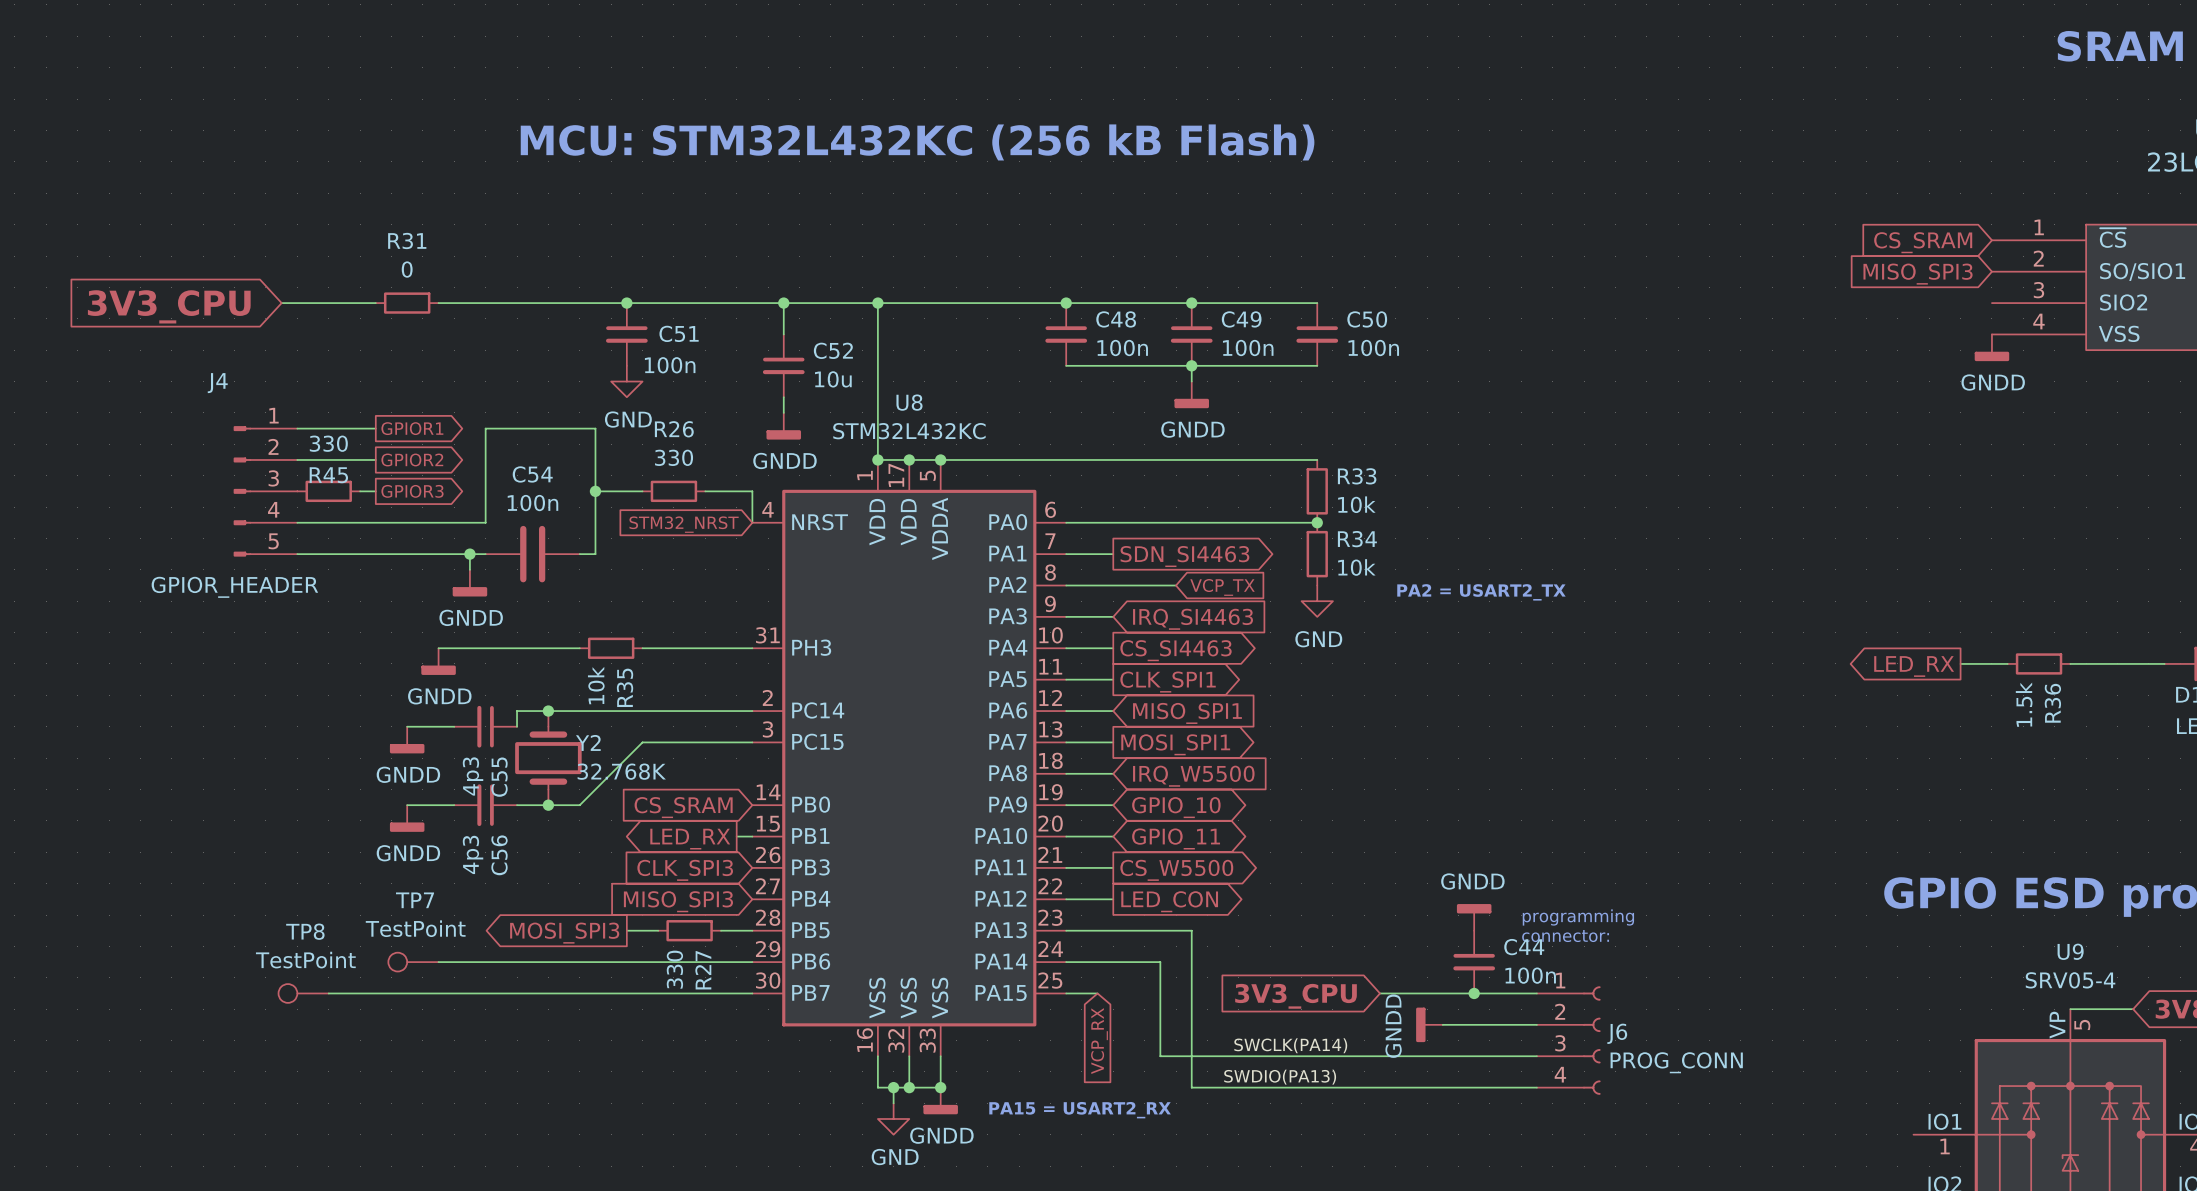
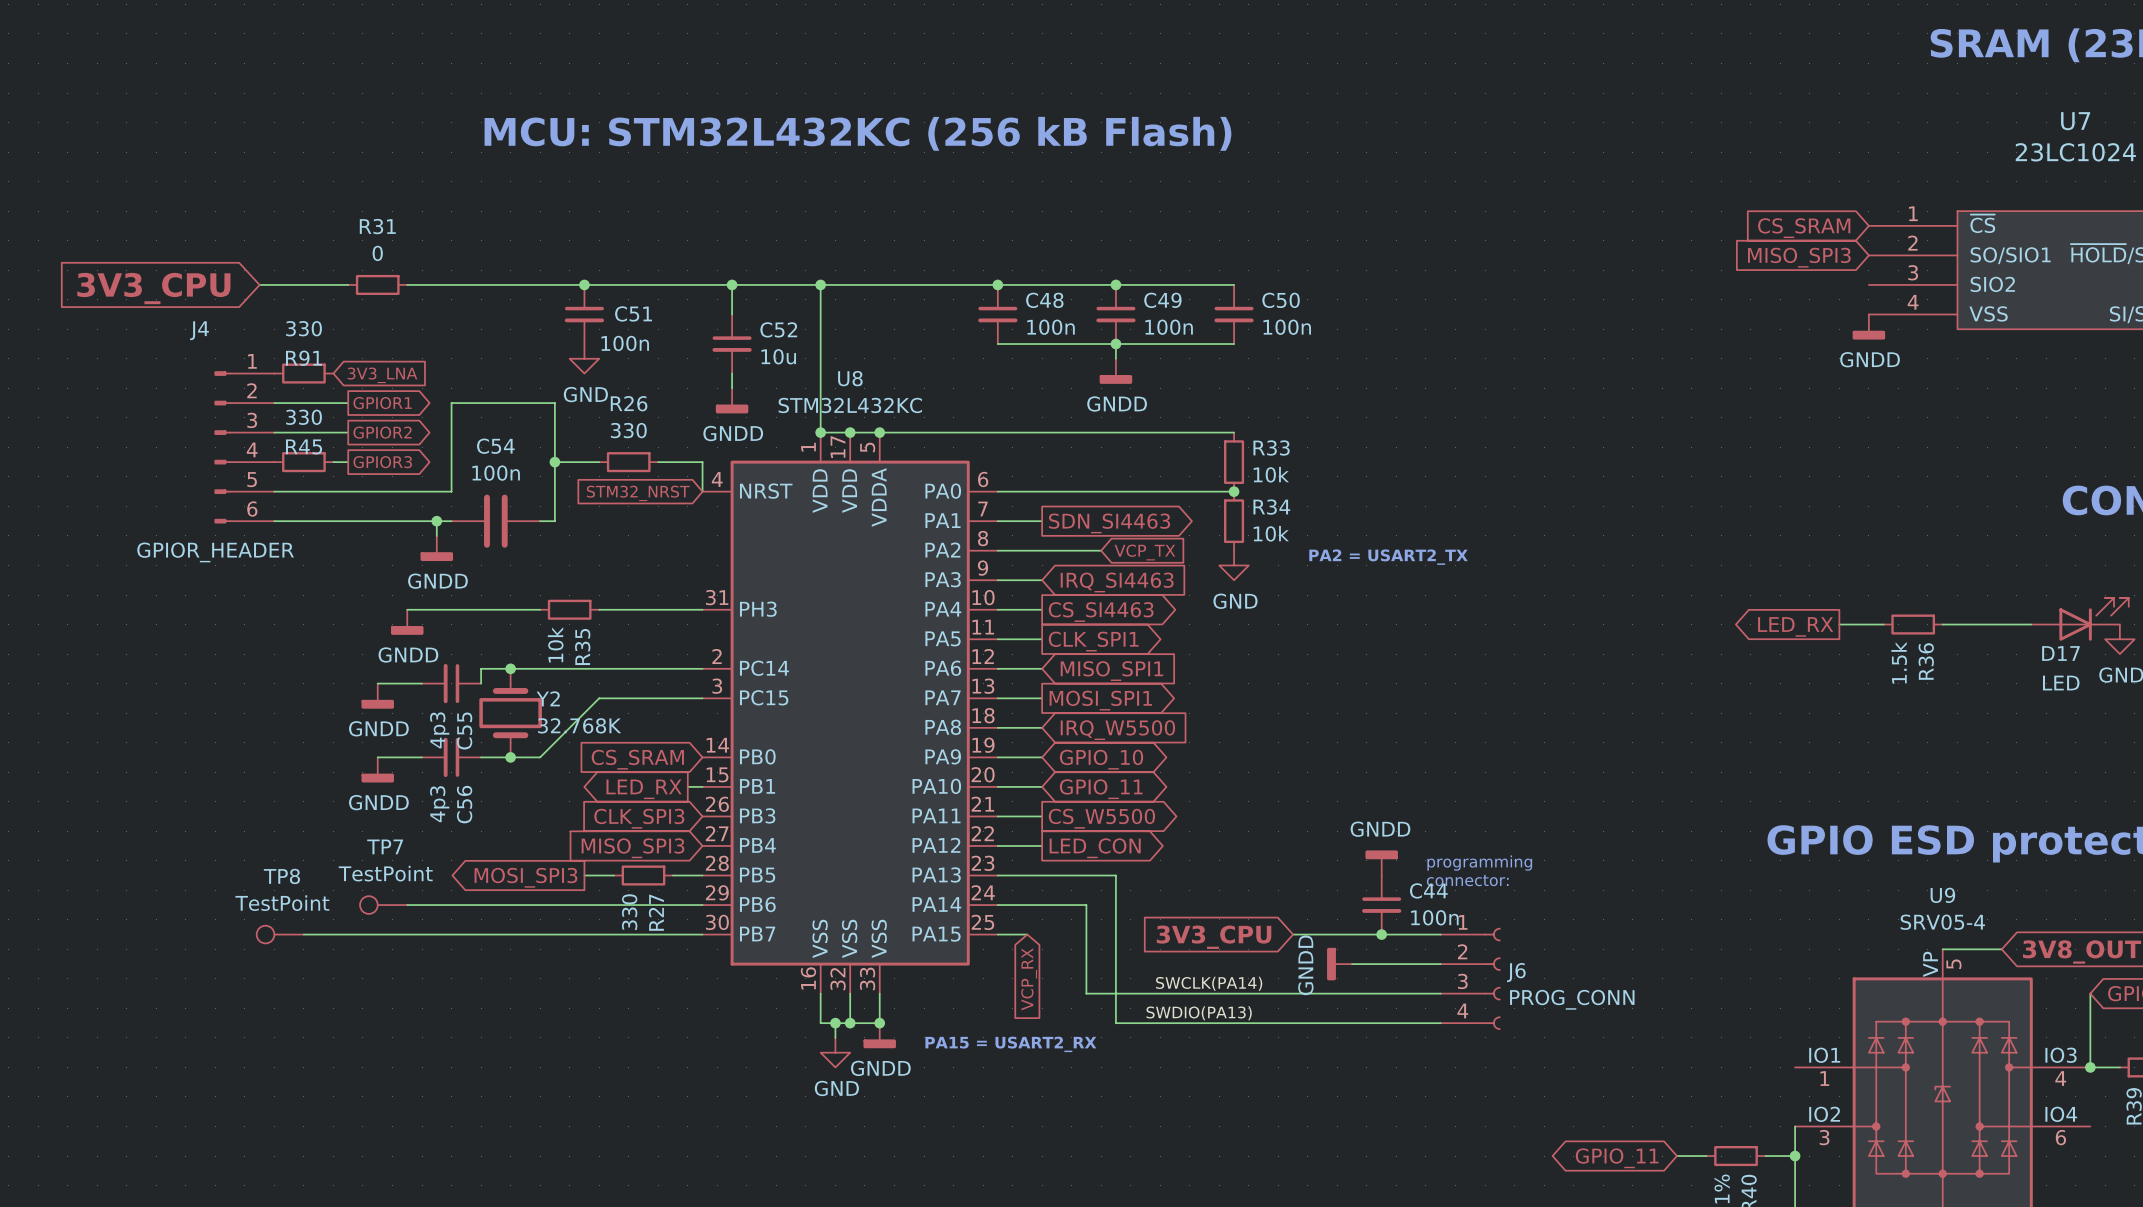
R91: none -> 330 (303, 373)
global label: none -> 3V3_LNA (382, 375)
J4 symbol: [233, 426, 298, 557] -> [214, 371, 275, 524]

